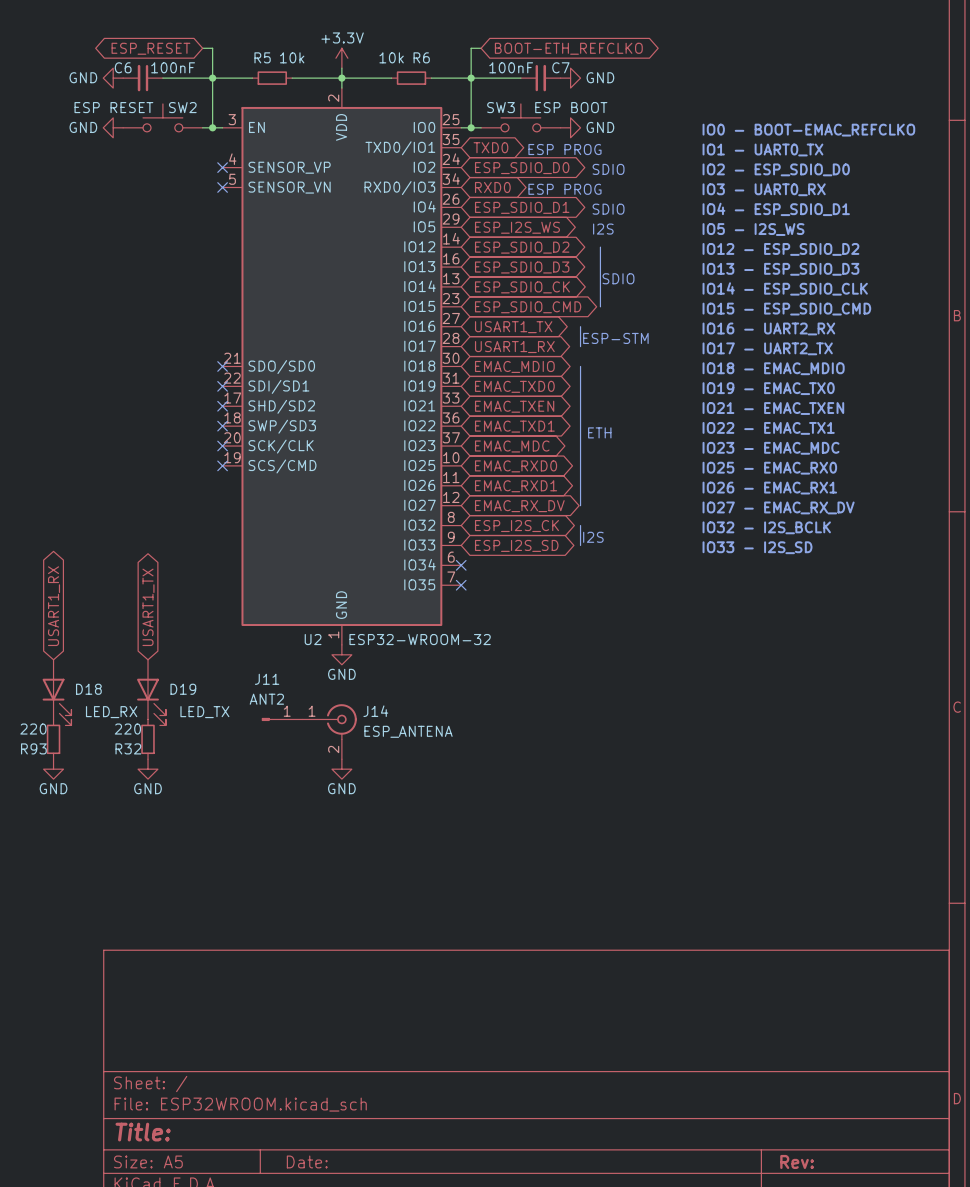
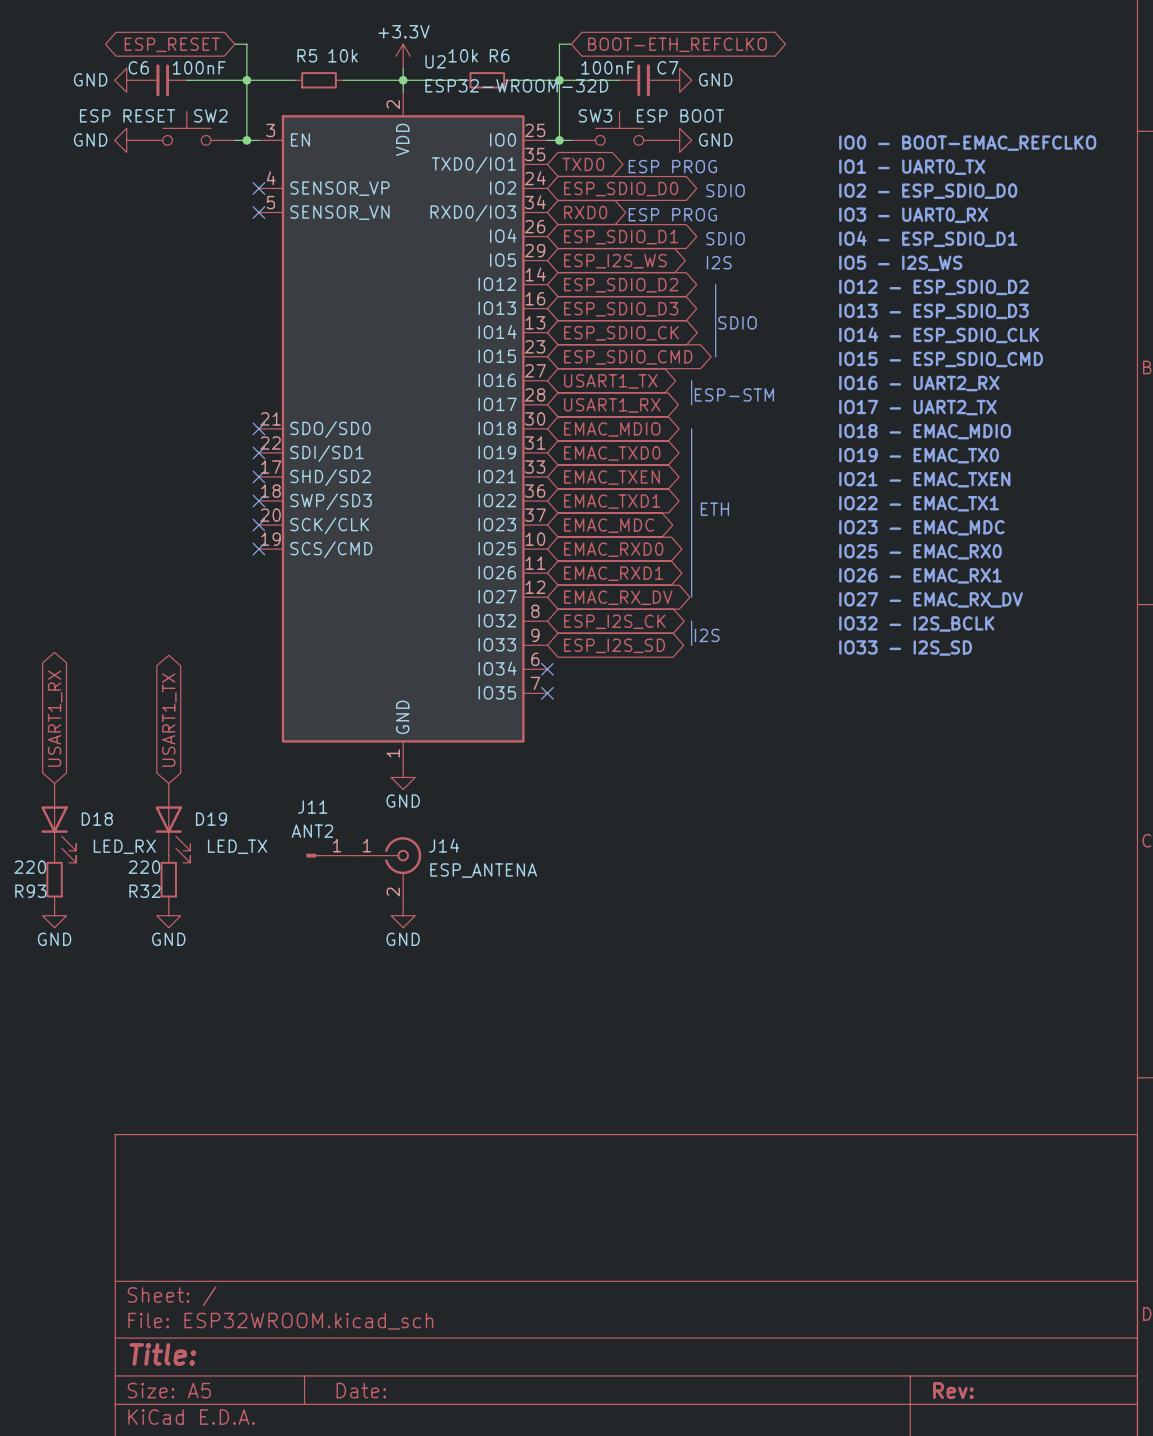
U2 name position: U2 (313, 639) -> U2 (435, 61)
U2 value: ESP32-WROOM-32 (420, 639) -> ESP32-WROOM-32D (516, 85)

